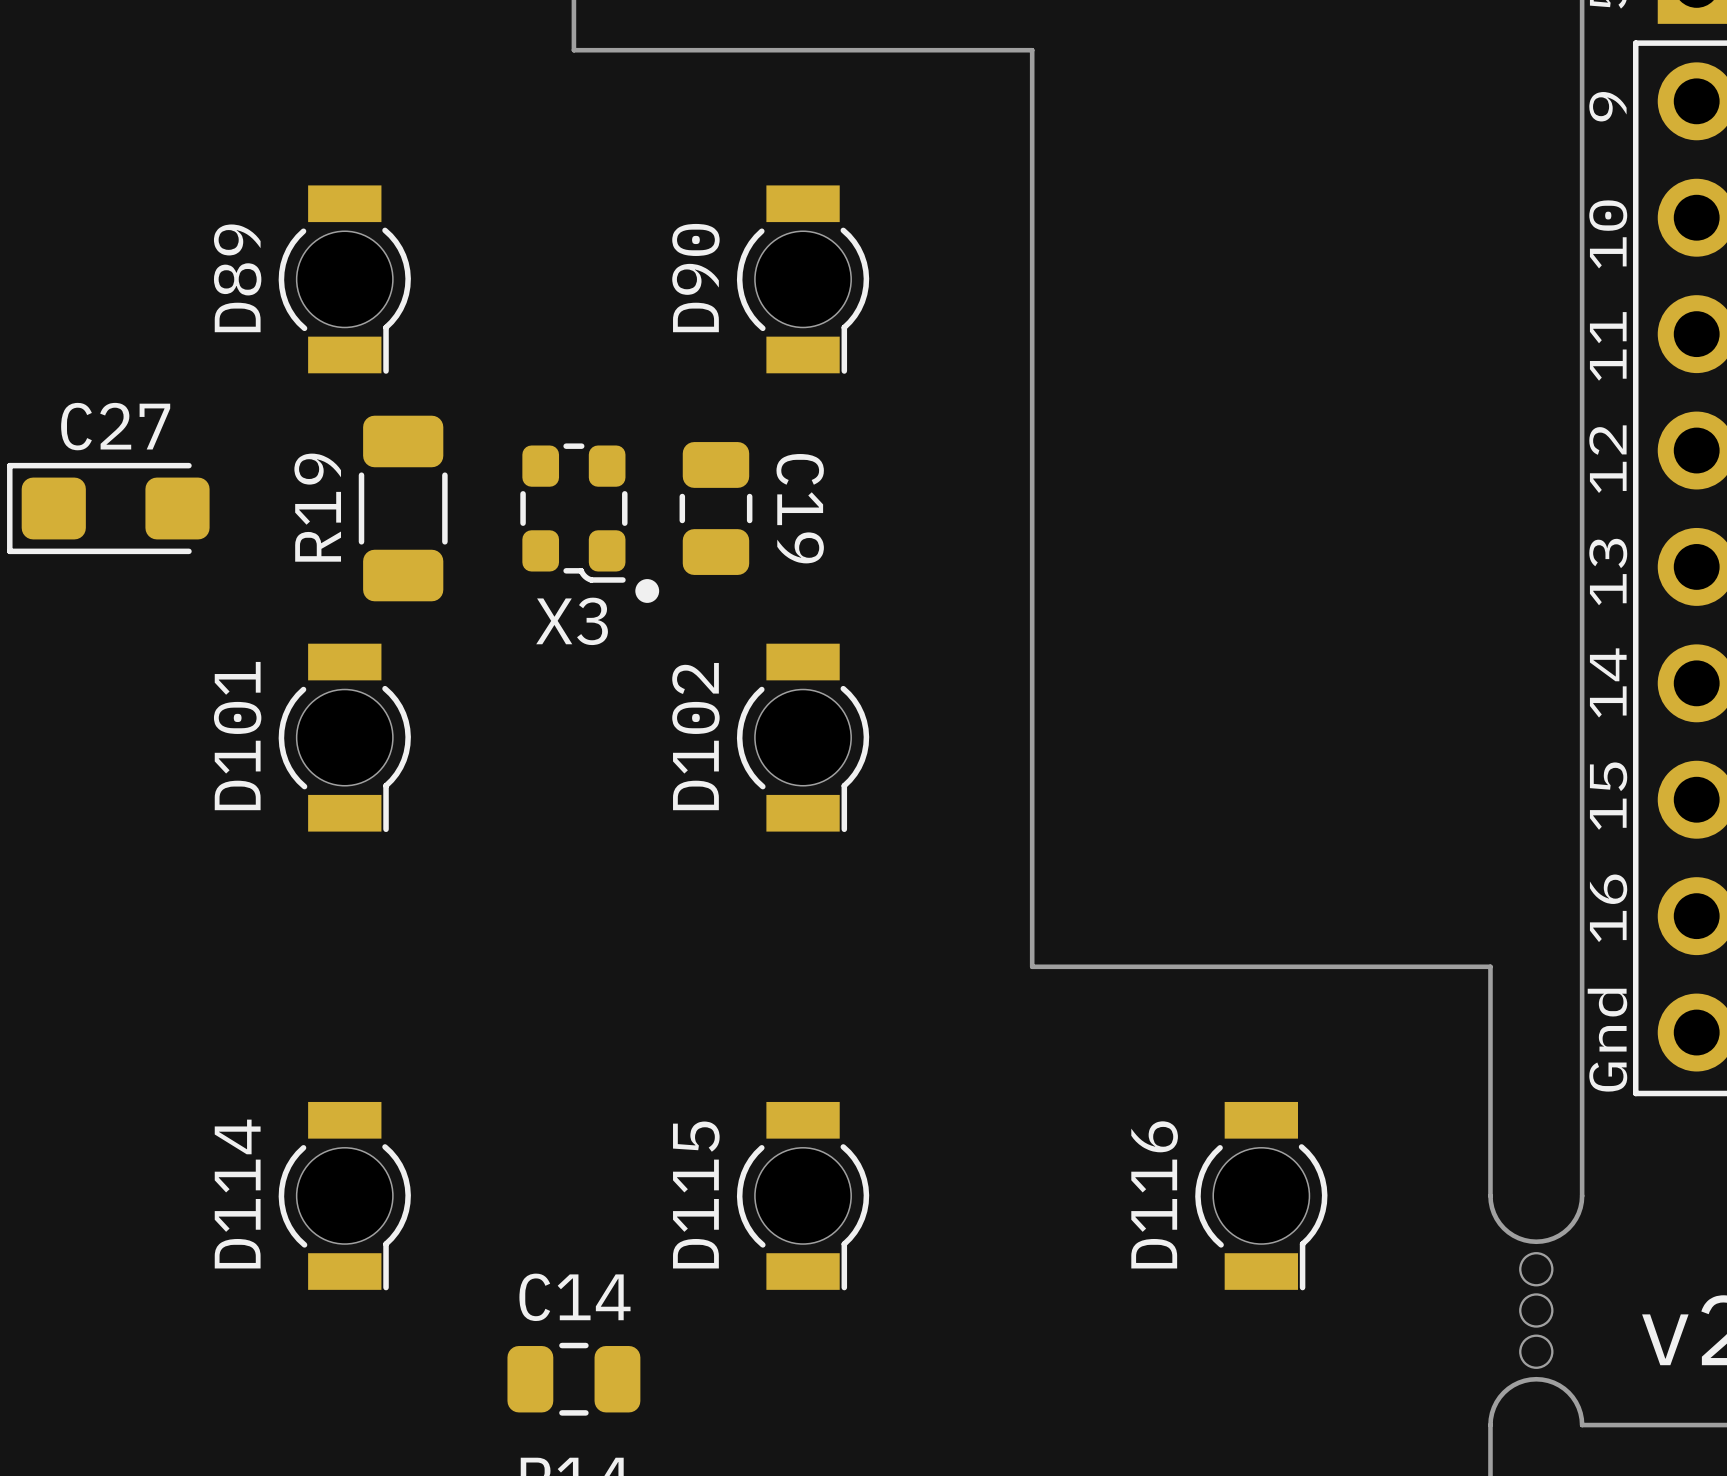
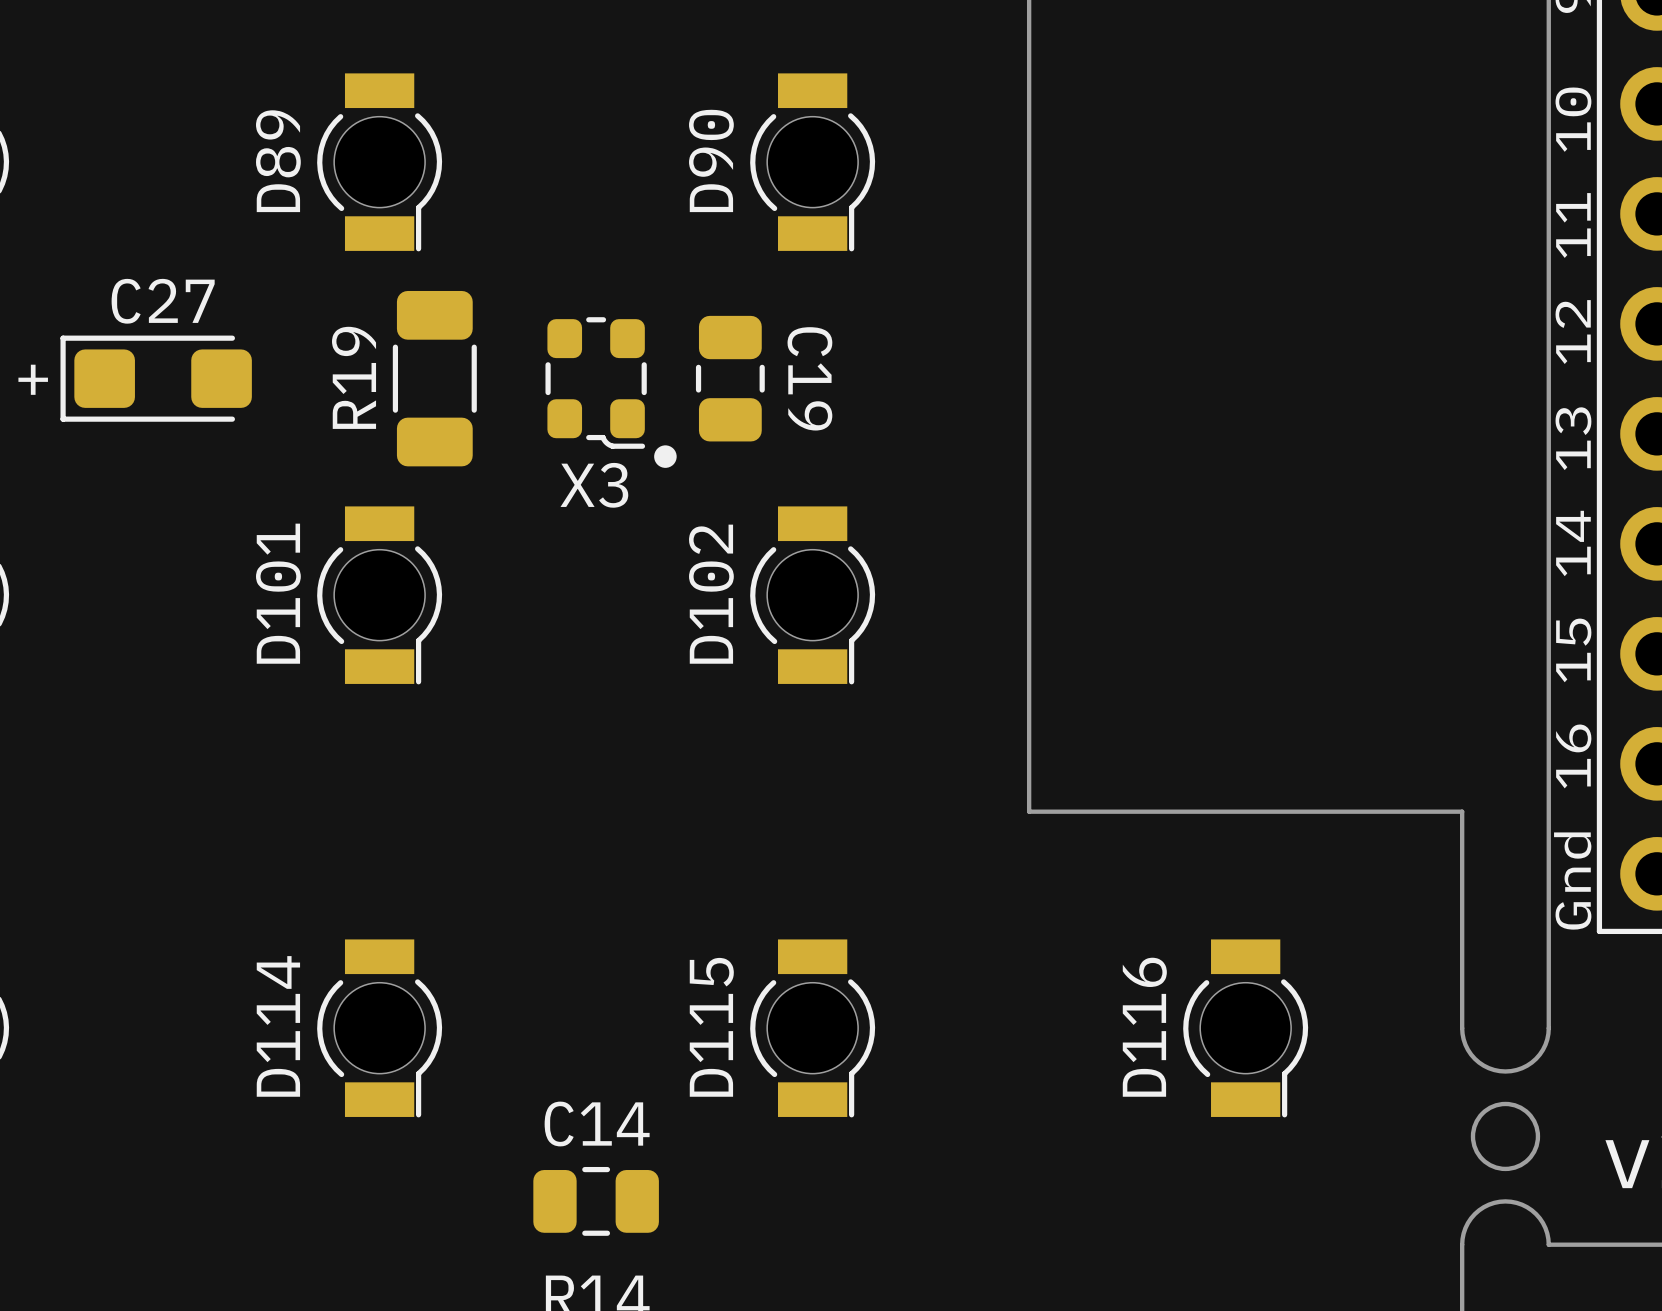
round board edge: [1519, 1252, 1554, 1287] -> none
round board edge size: [1519, 1293, 1554, 1328] -> [1470, 1101, 1541, 1172]
round board edge: [1519, 1334, 1554, 1369] -> none

